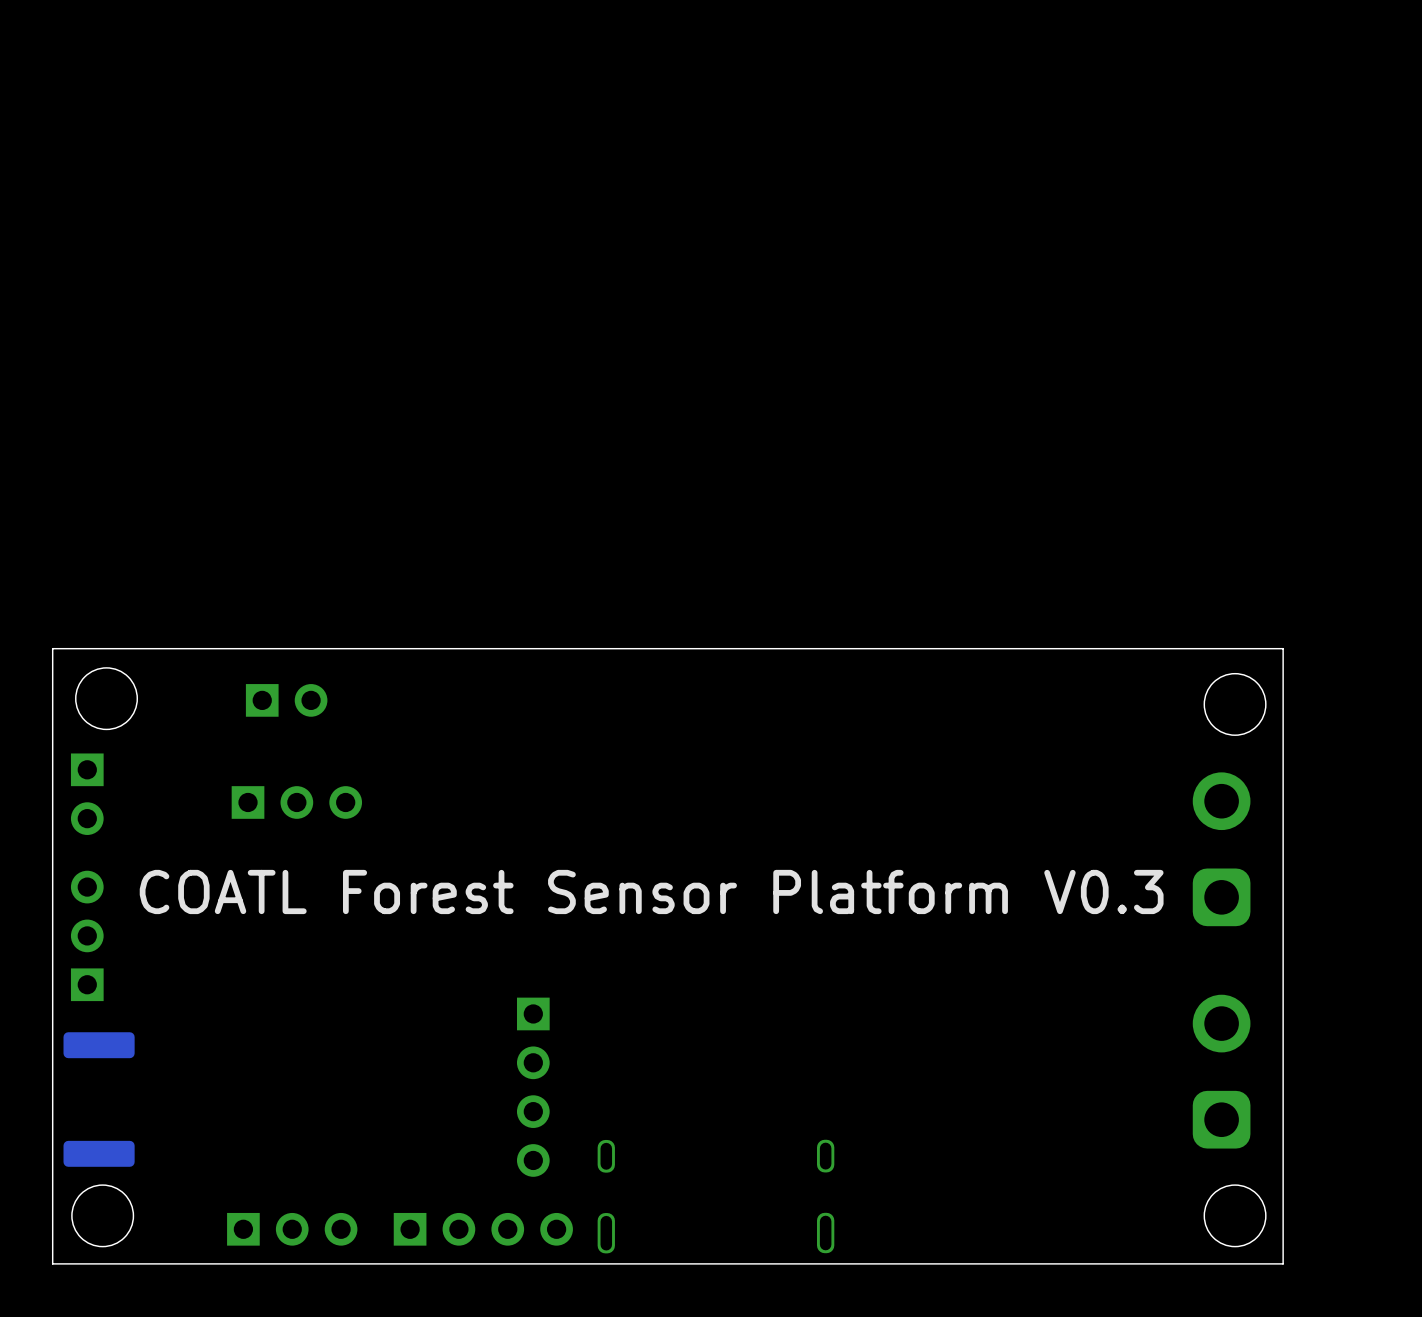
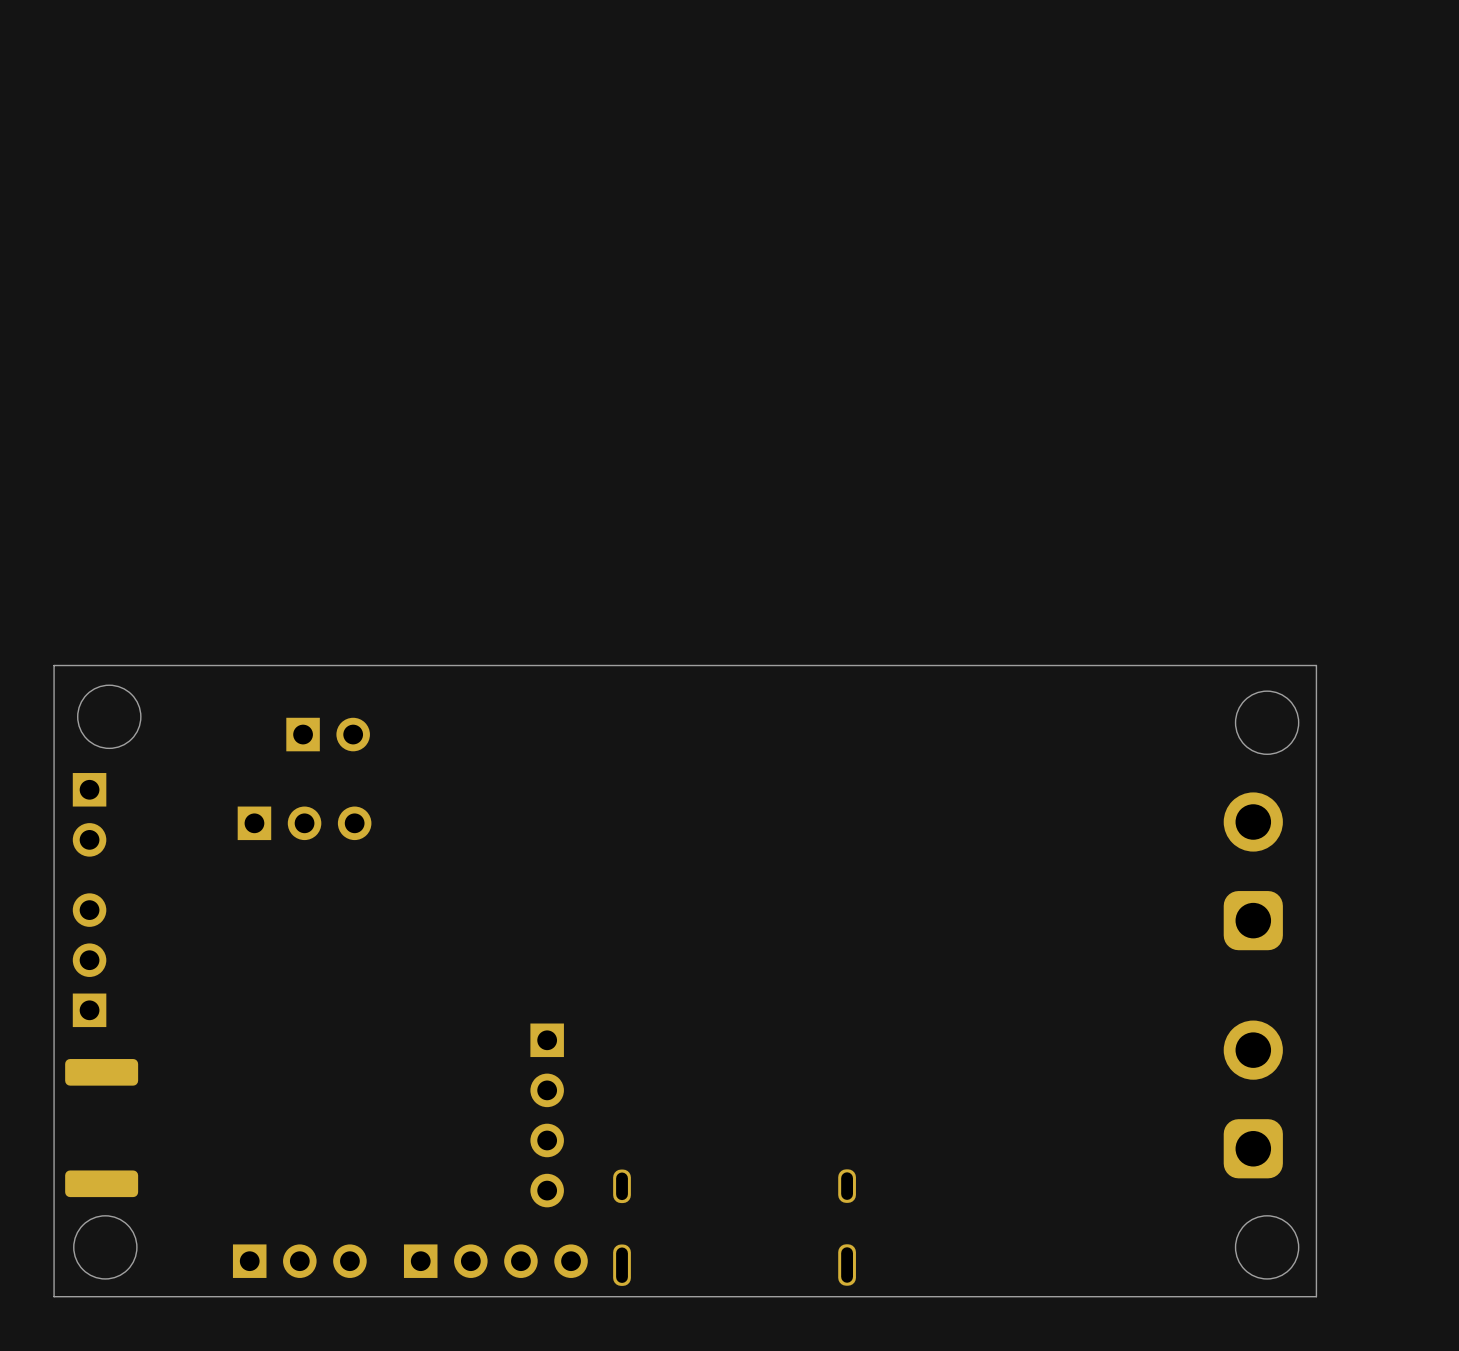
part position: (286, 700) -> (328, 734)
text: COATL Forest Sensor Platform V0.3 (651, 891) -> none

